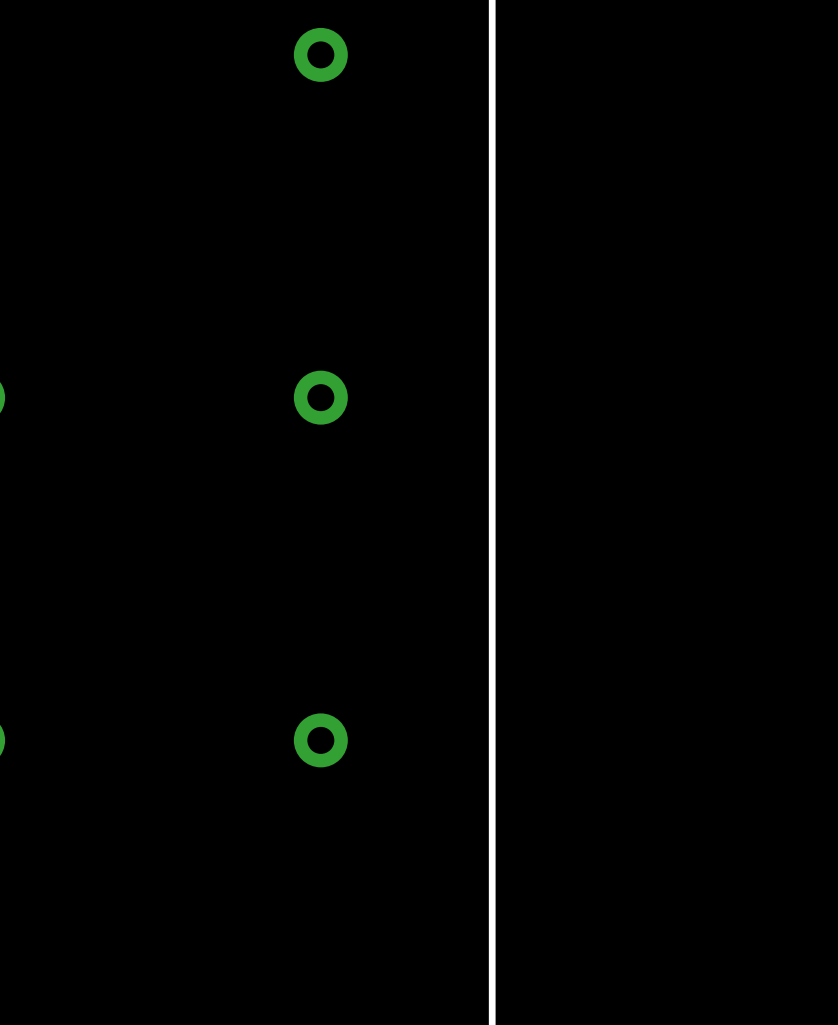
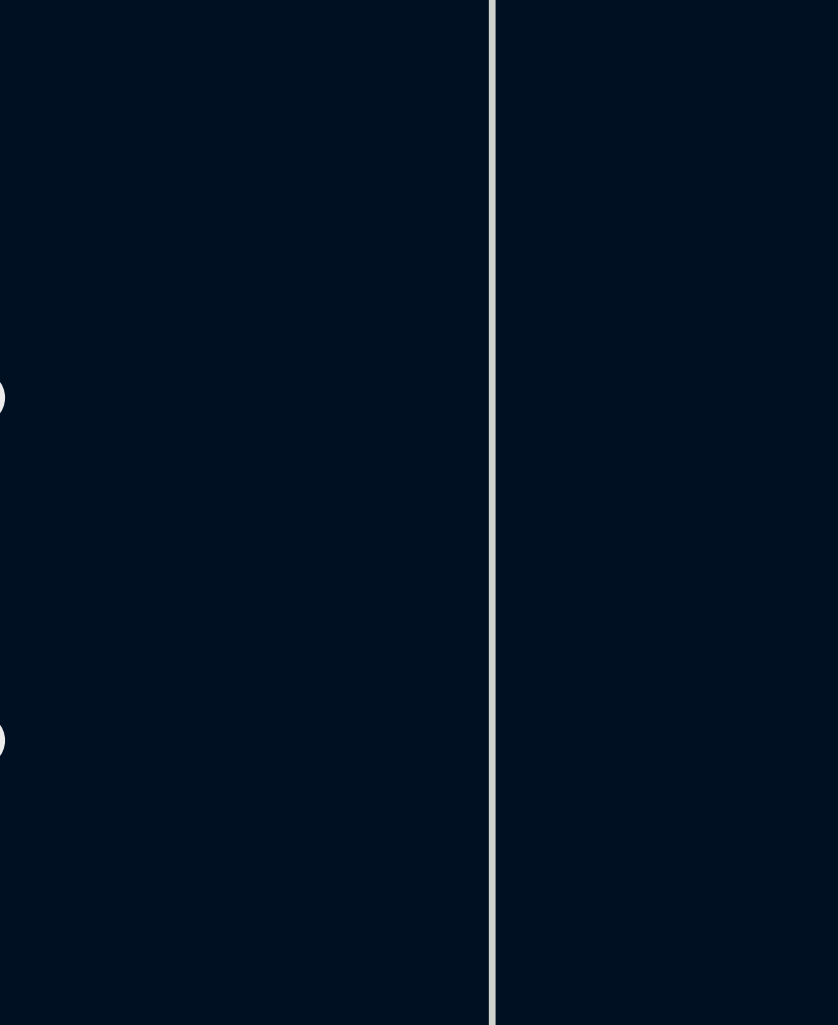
via: (320, 54) -> none
via: (320, 397) -> none
via: (320, 740) -> none

